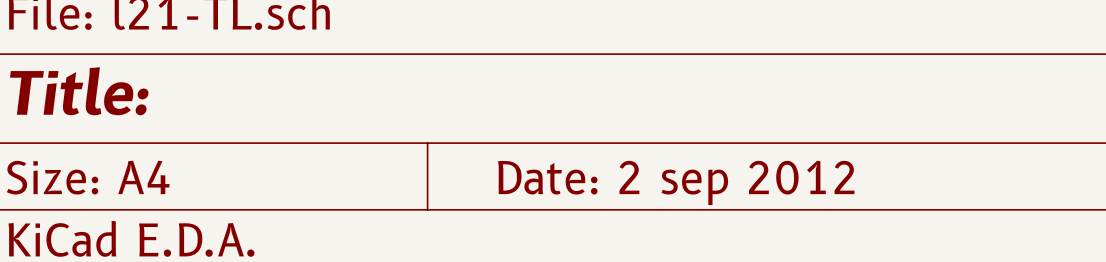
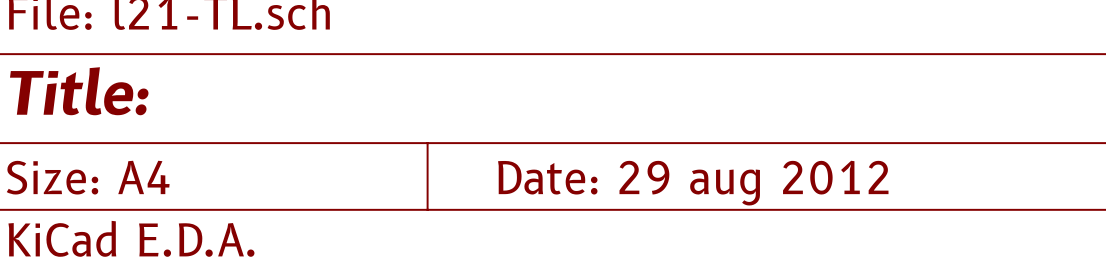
title block: Date: 2 sep 2012 (676, 182) -> Date: 29 aug 2012 (693, 183)

